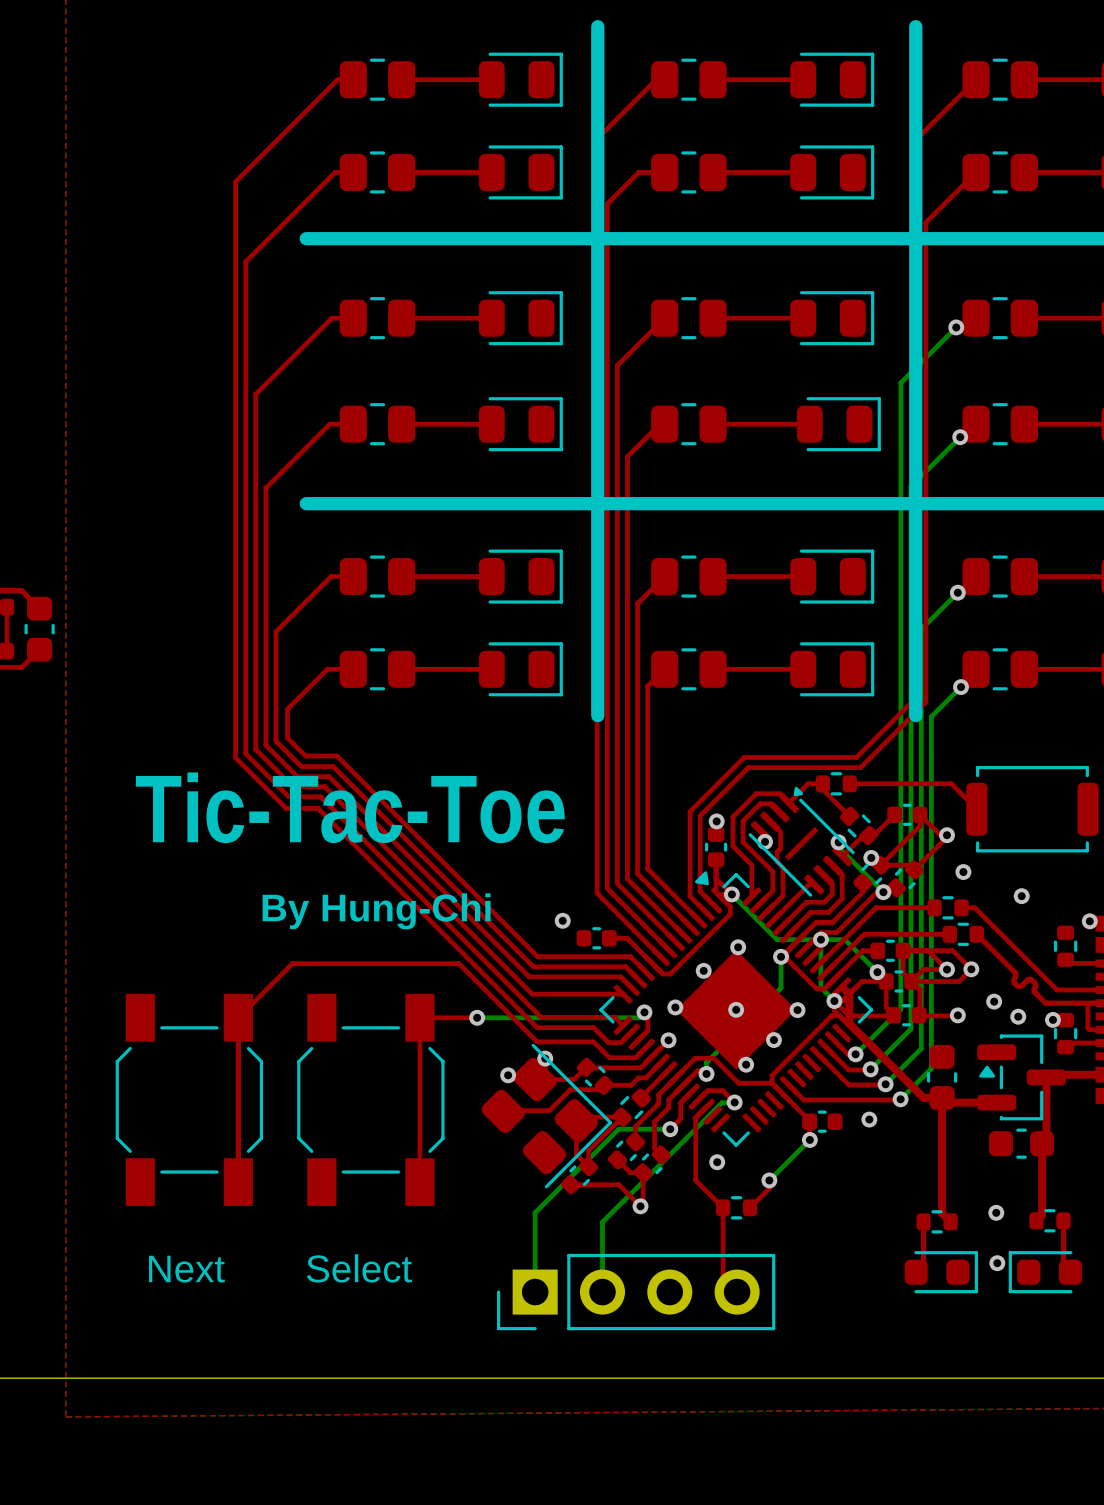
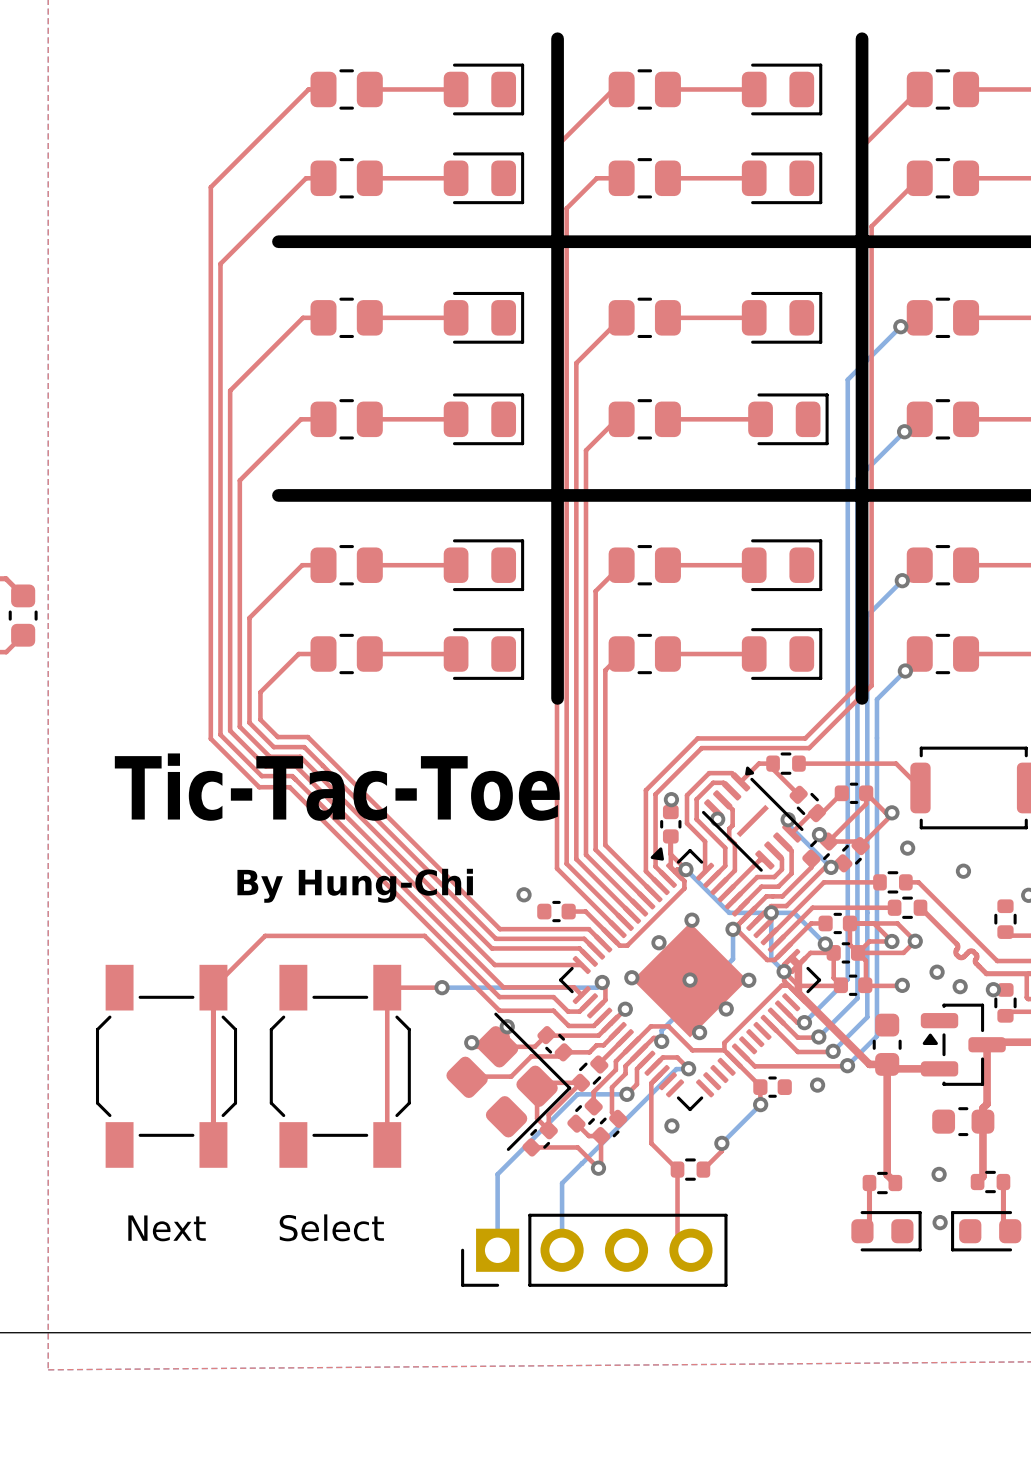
part position: (1021, 1143) -> (963, 1121)

